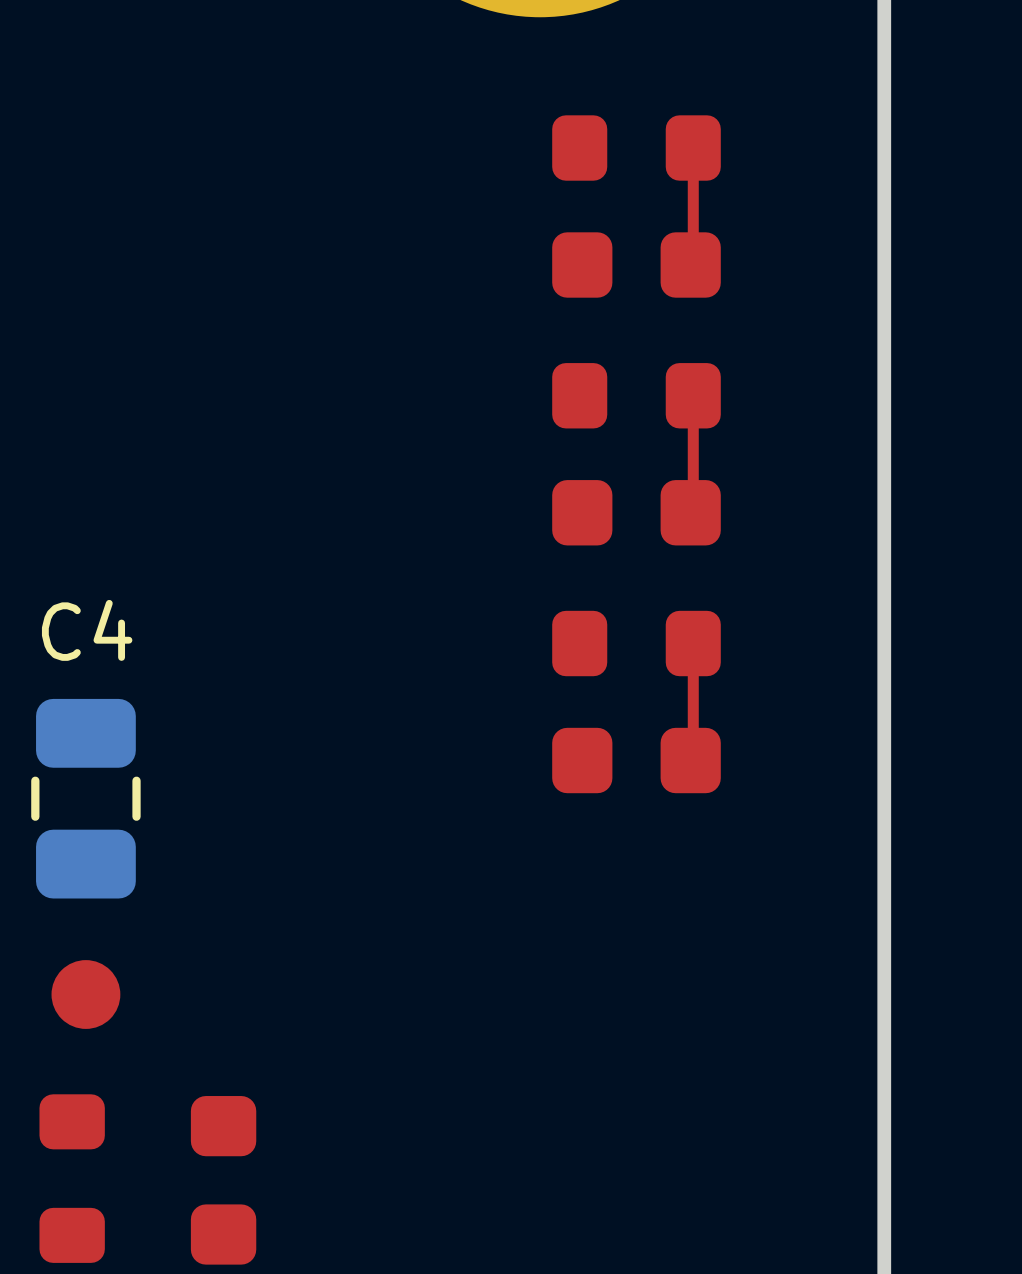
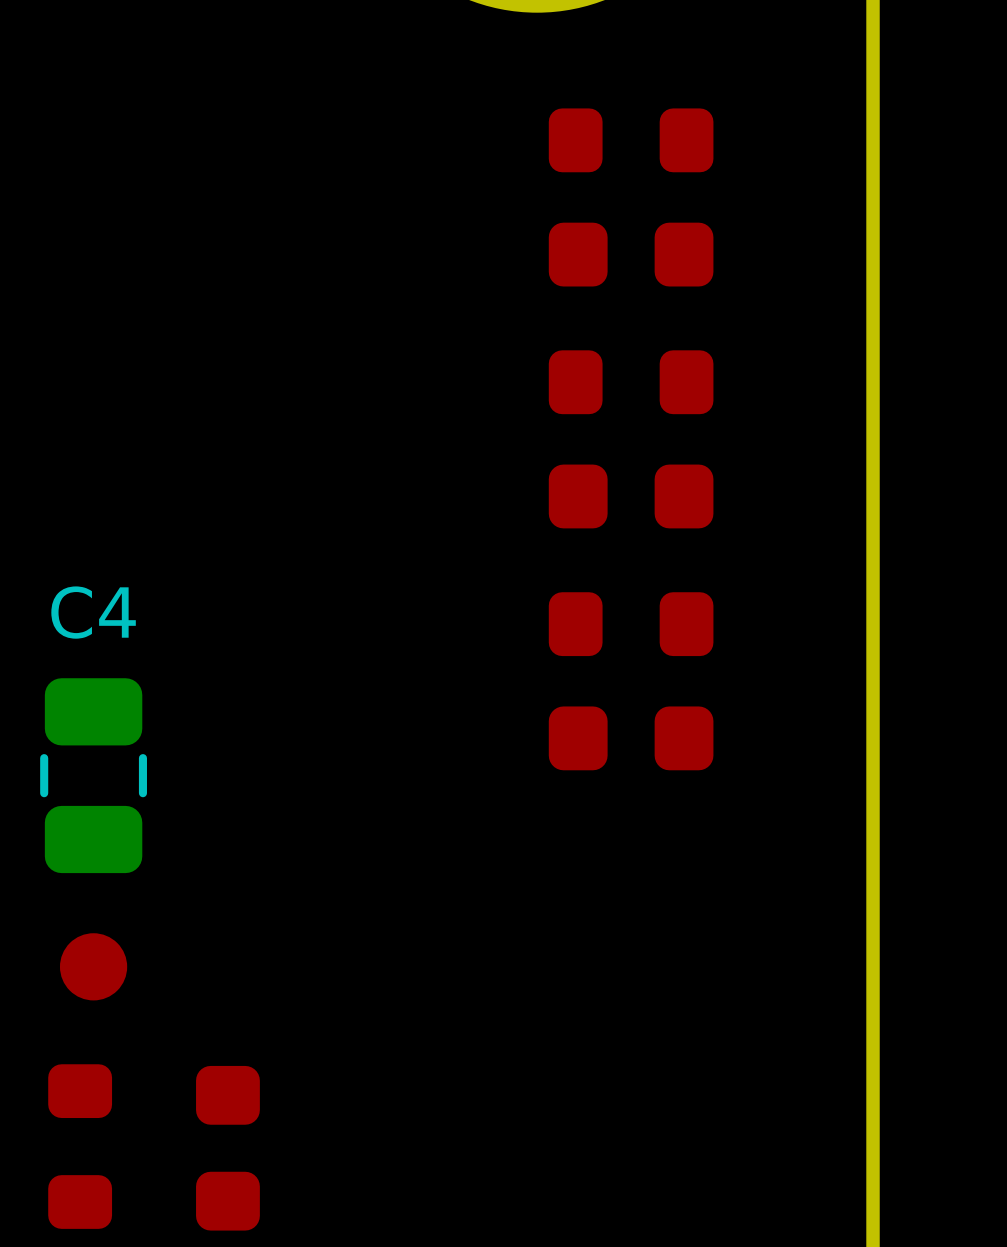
top track: (693, 148) (693, 262) (690, 265) -> none
top track: (693, 395) (693, 510) (690, 512) -> none
top track: (693, 643) (693, 757) (690, 760) -> none

